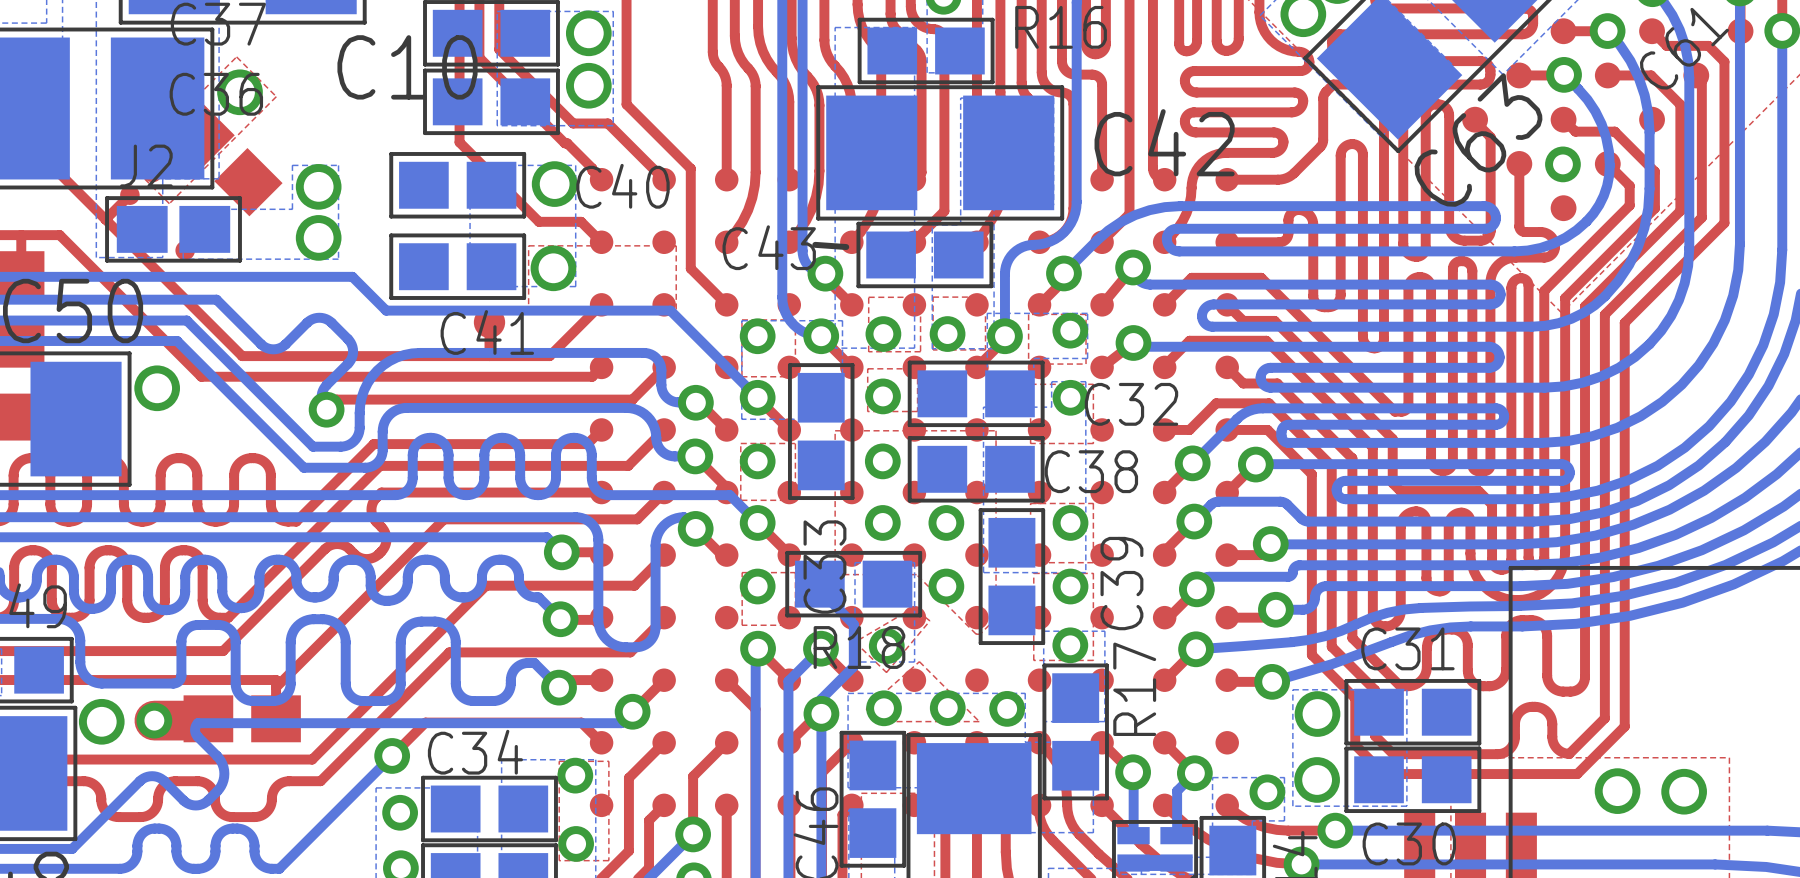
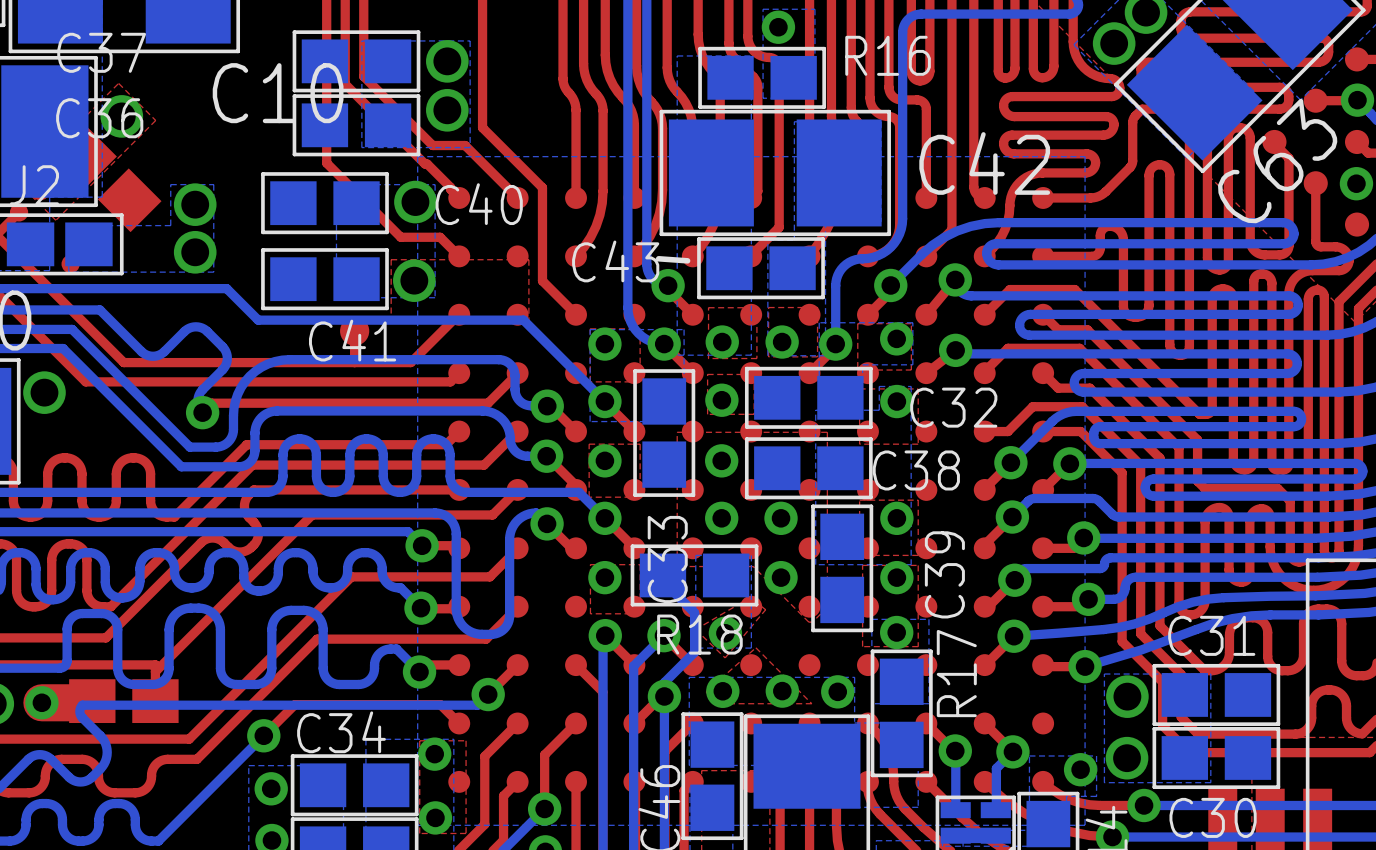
bottom zone outline: none -> (1085, 156) (1085, 825) (417, 825) (417, 156) (1085, 156)

